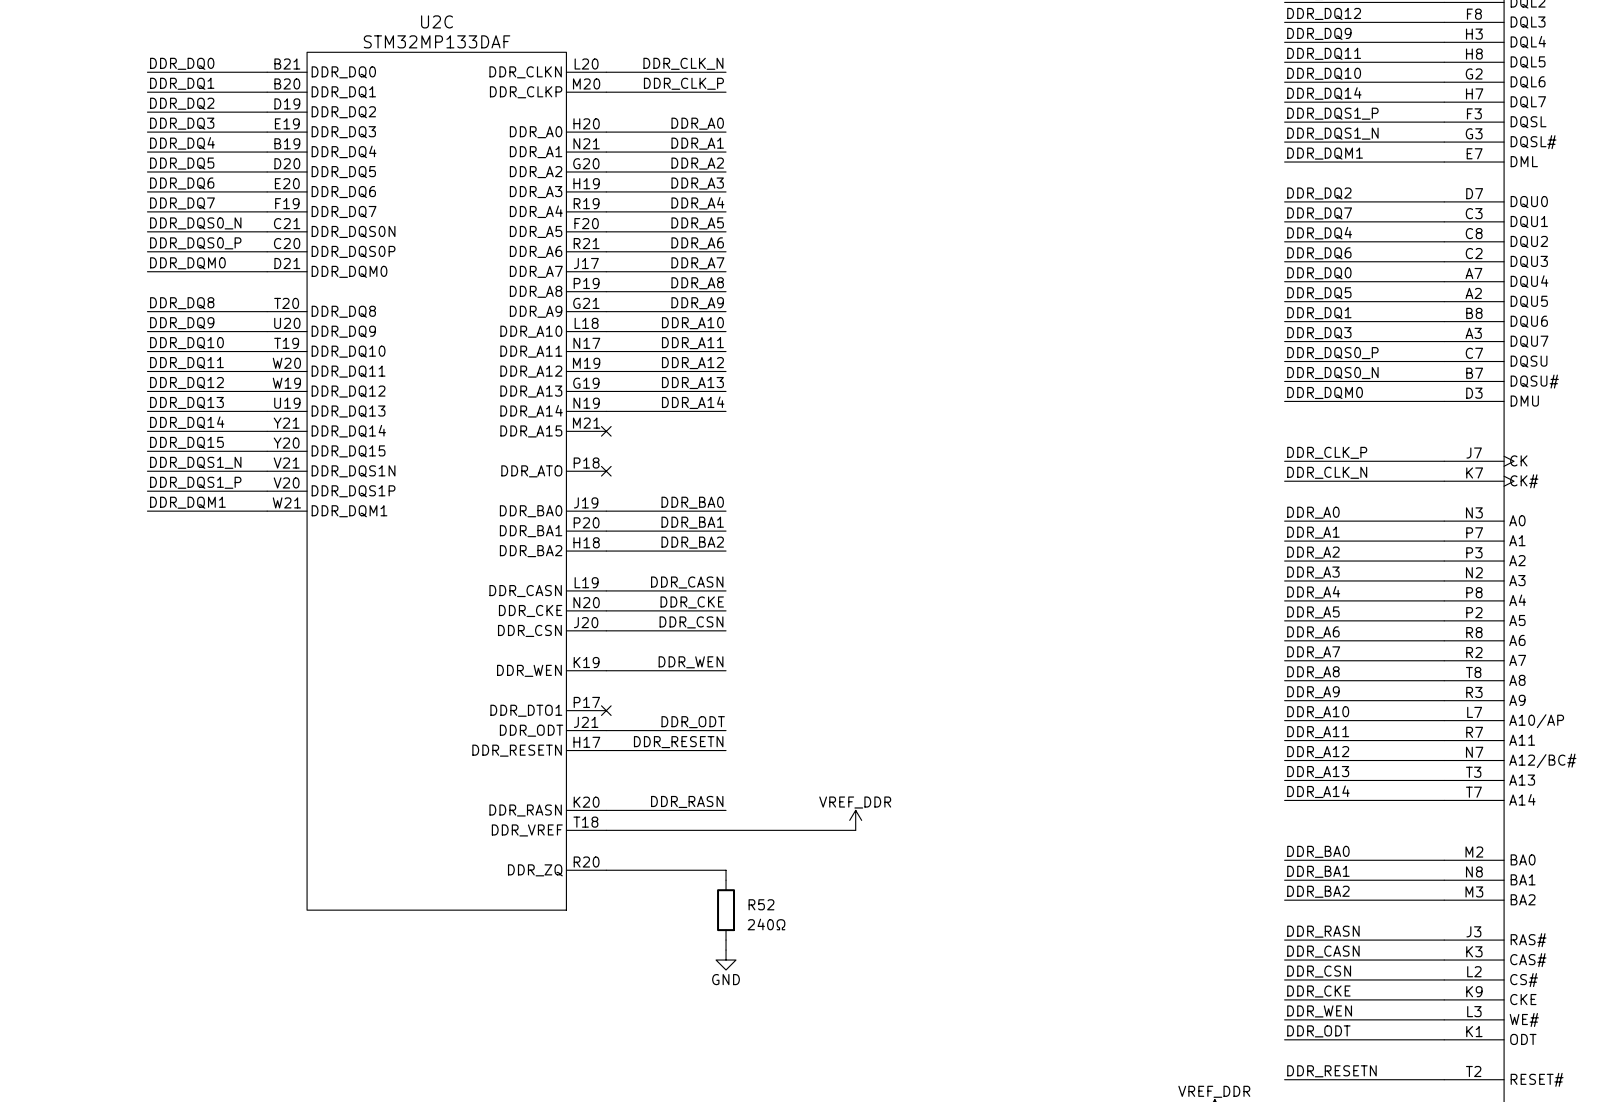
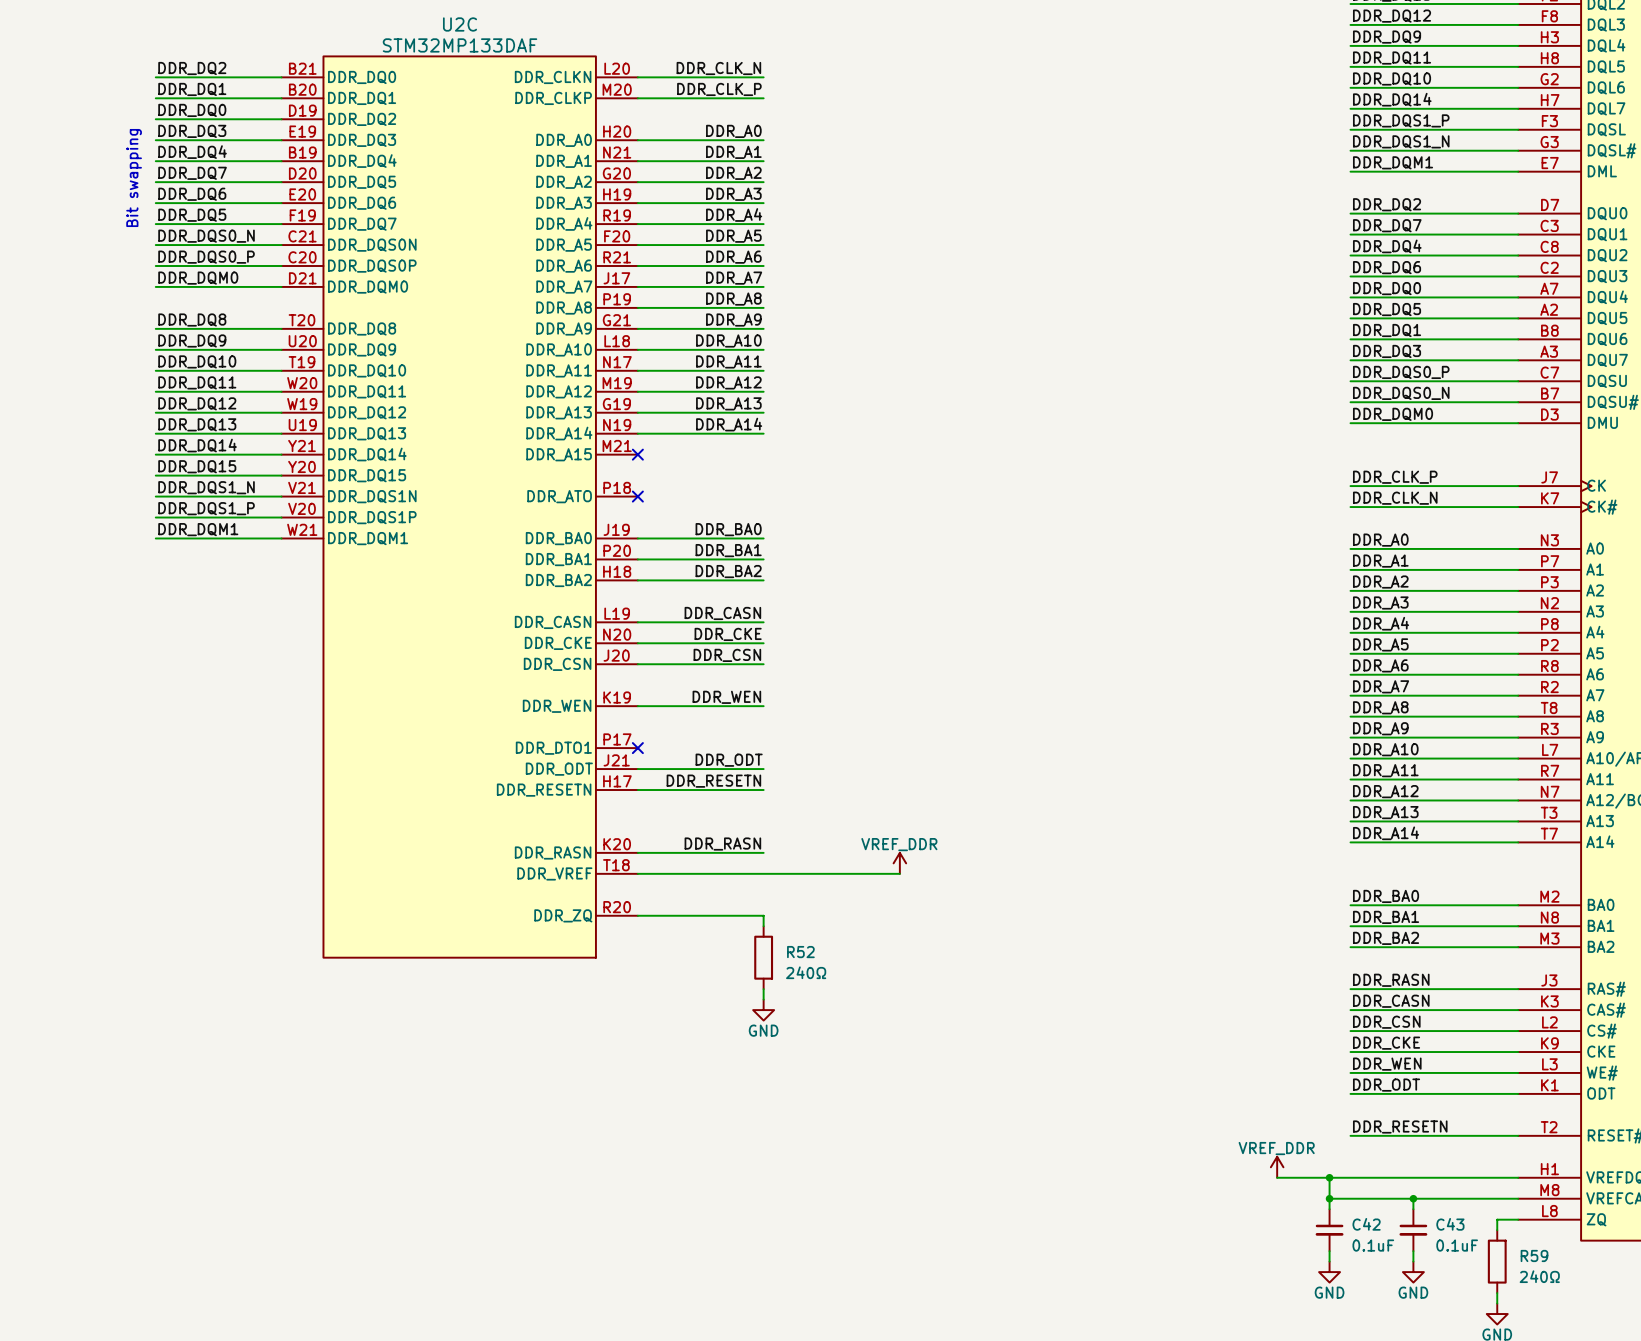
label: DDR_DQ0 (182, 63) -> DDR_DQ2 (192, 68)
label: DDR_DQ2 (182, 103) -> DDR_DQ0 (192, 110)
label: DDR_DQ5 (182, 163) -> DDR_DQ7 (192, 173)
text: none -> Bit swapping (134, 177)
label: DDR_DQ7 (182, 203) -> DDR_DQ5 (192, 215)

